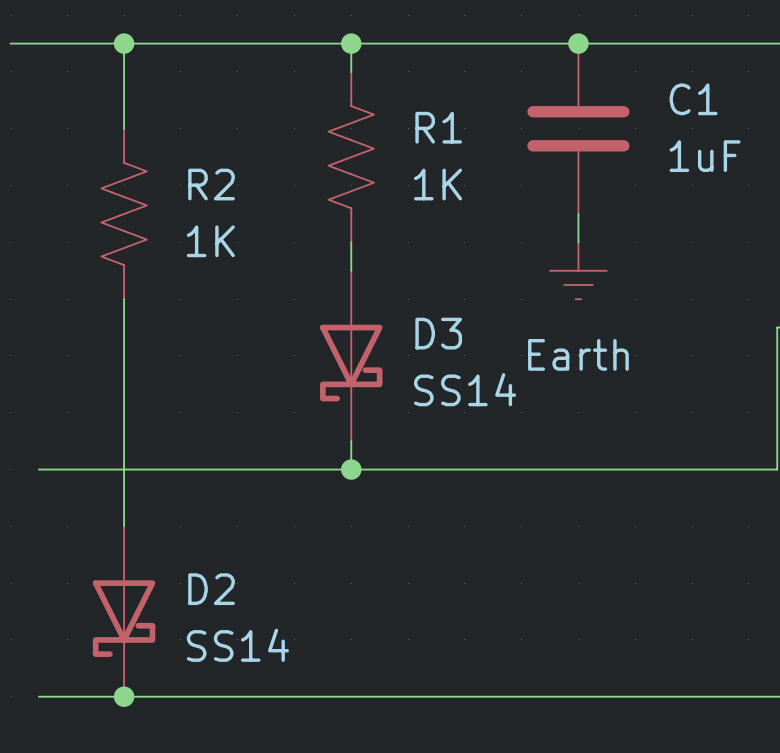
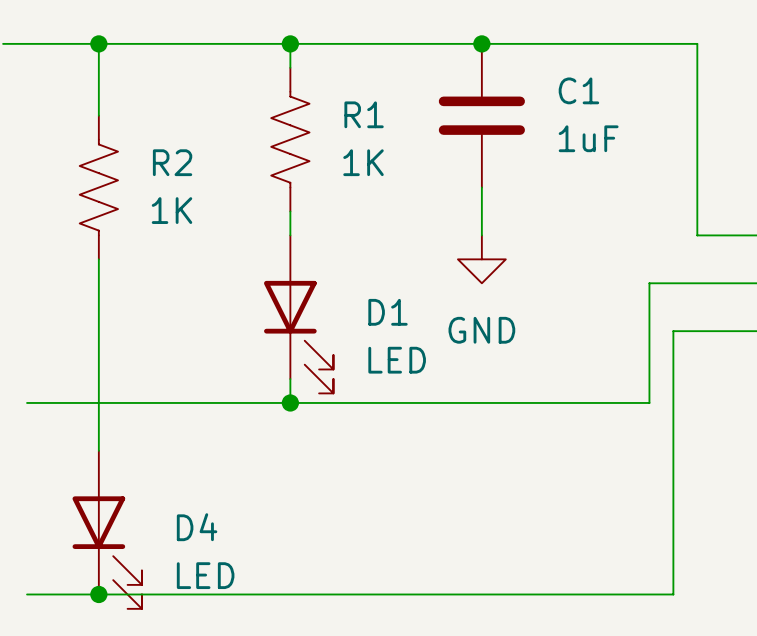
power symbol: Earth (578, 270) -> none
power symbol: none -> GND (481, 259)
D3: SS14 (351, 355) -> none
D1: none -> LED (298, 314)
D2: SS14 (124, 611) -> none
D4: none -> LED (107, 529)

